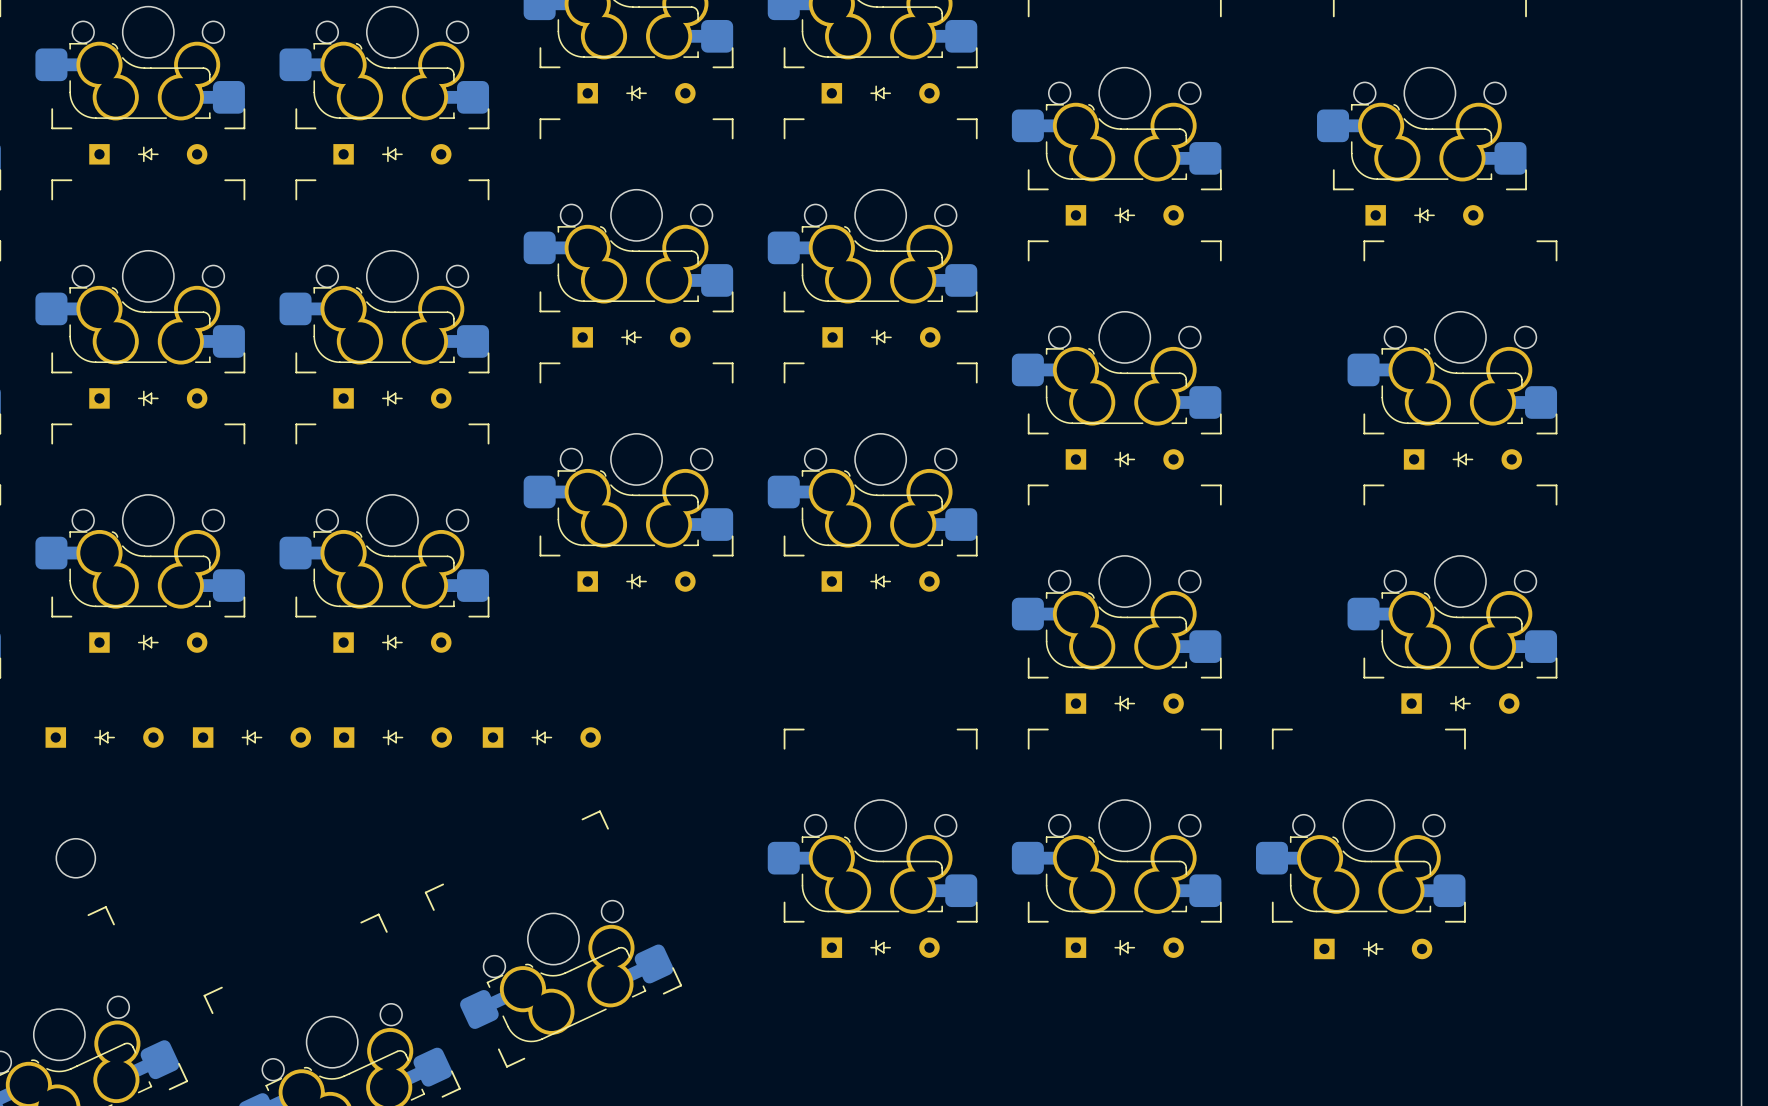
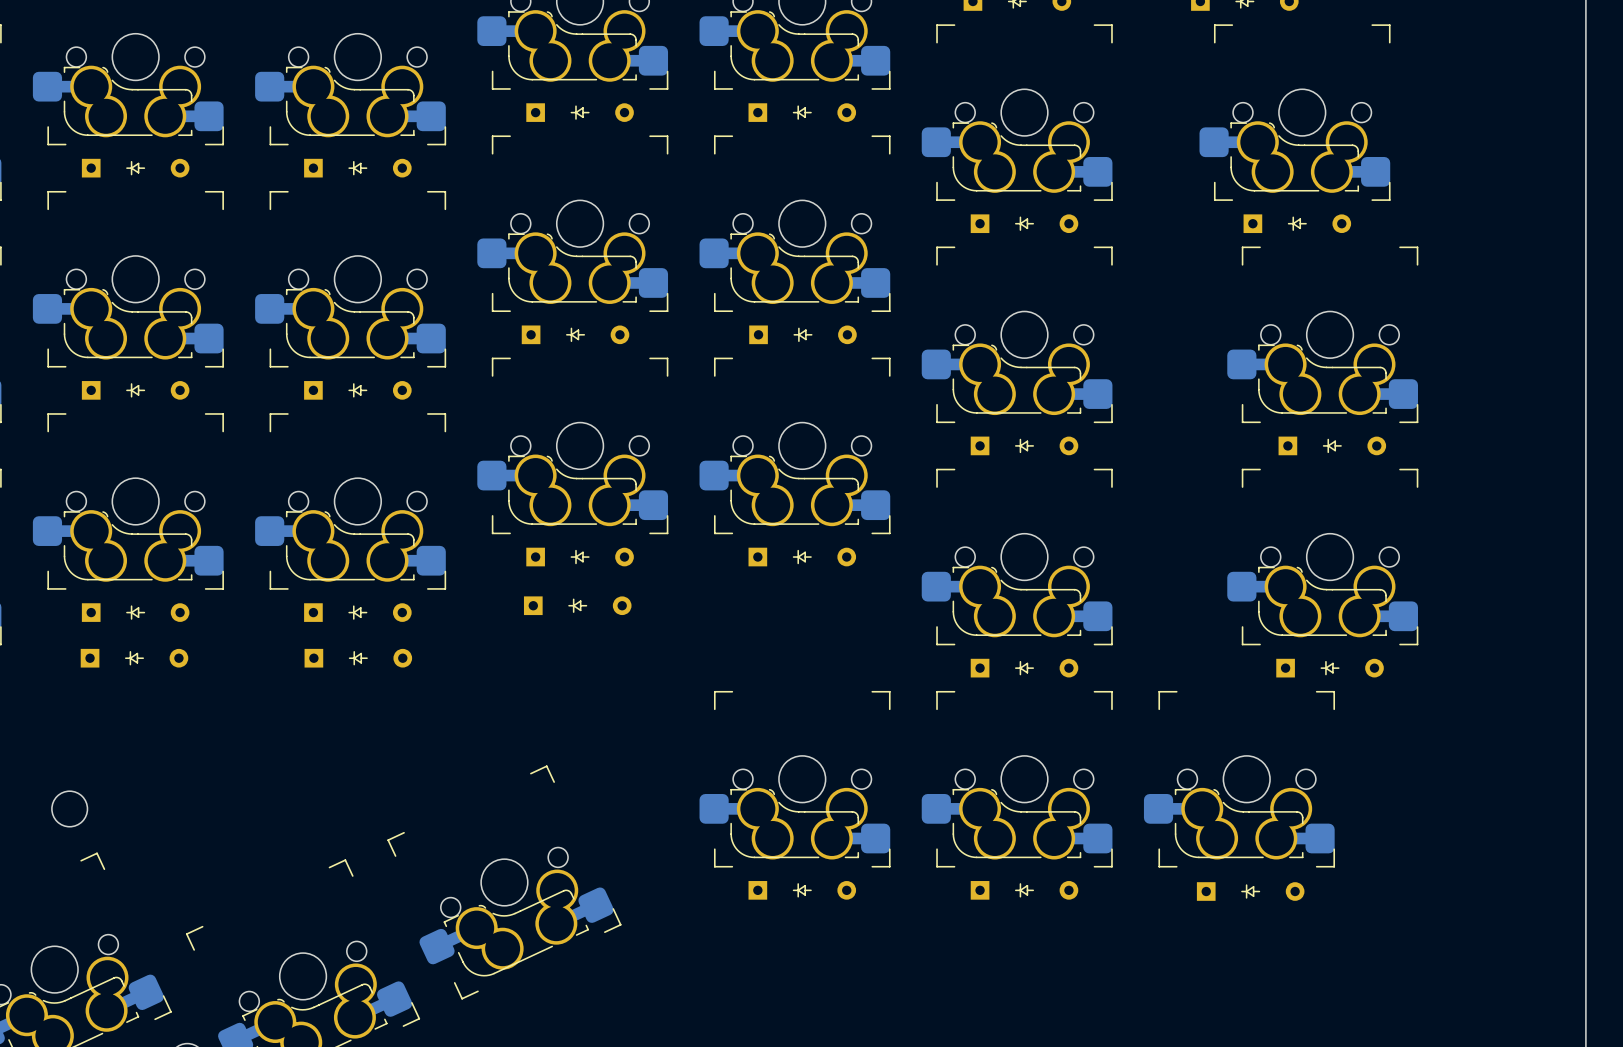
part: none -> (577, 605)
part: none -> (134, 658)
part: (104, 737) -> none
part: (251, 737) -> none
part position: (392, 737) -> (358, 658)
part: (541, 737) -> none

